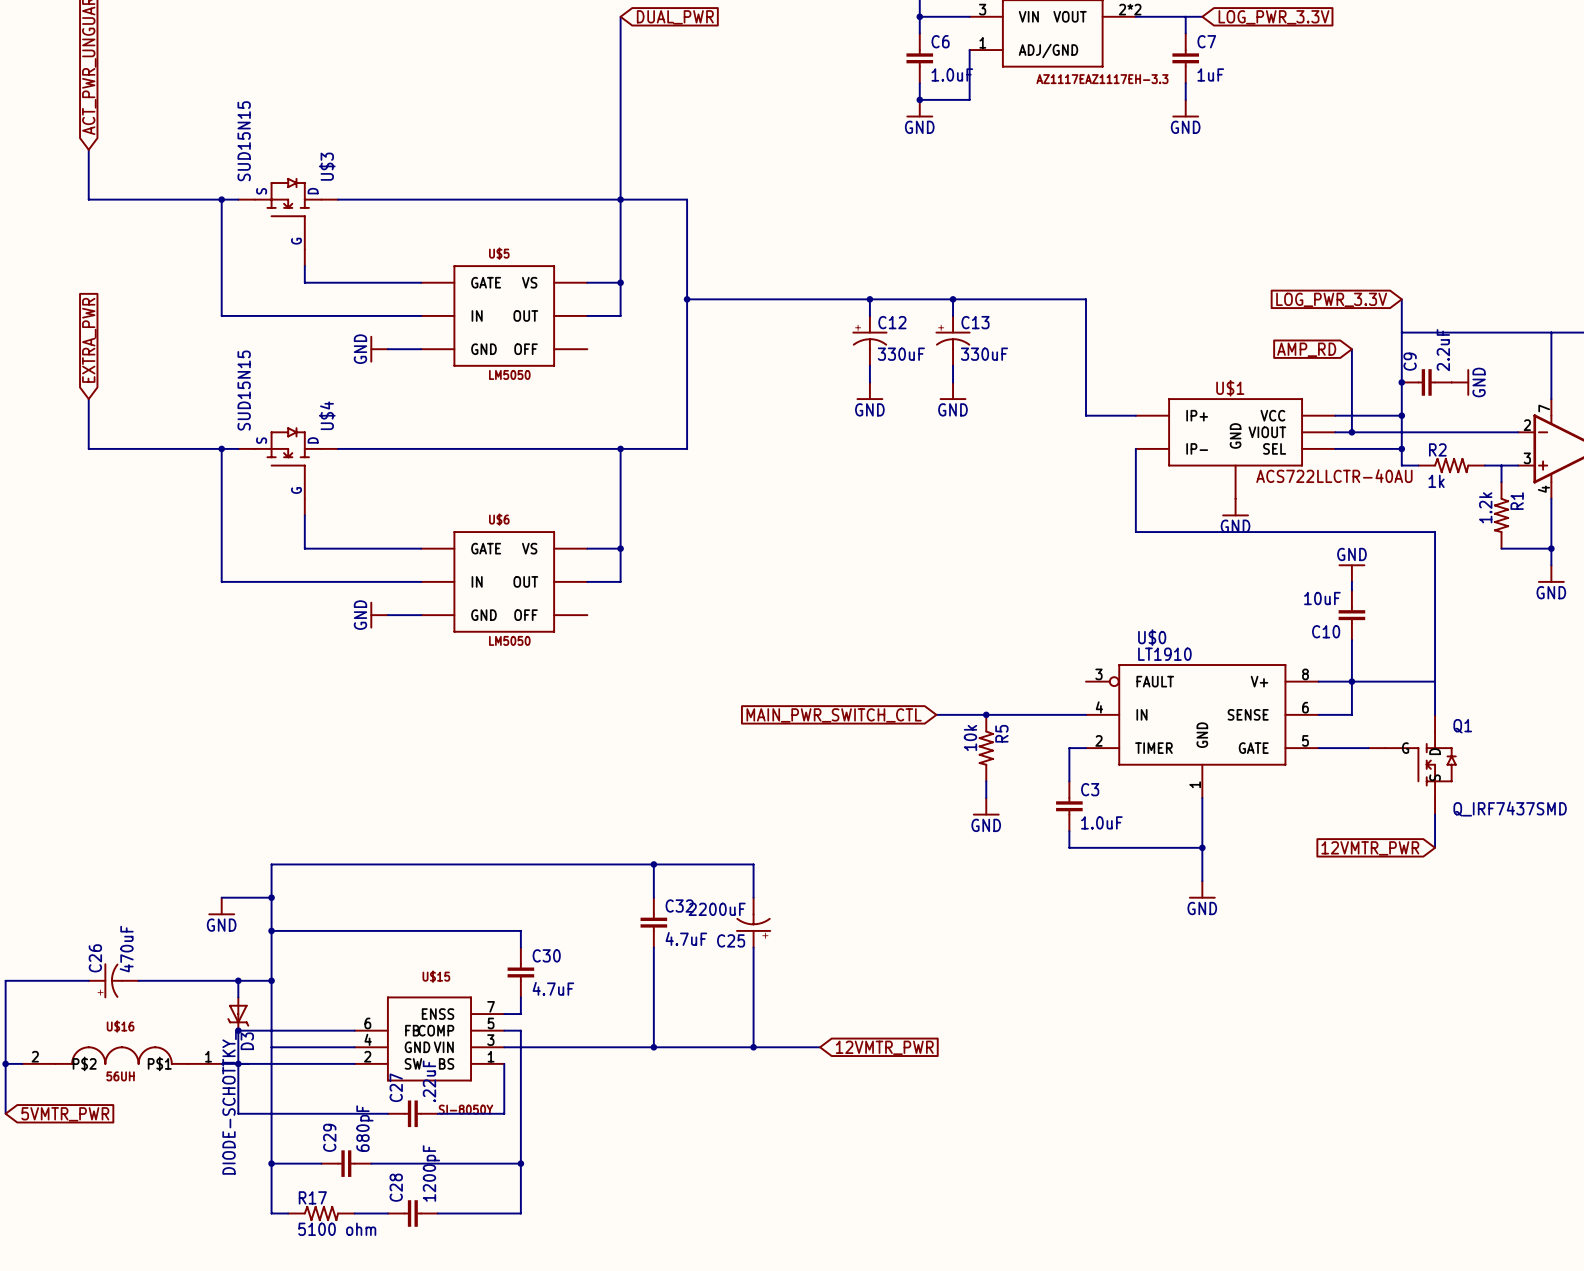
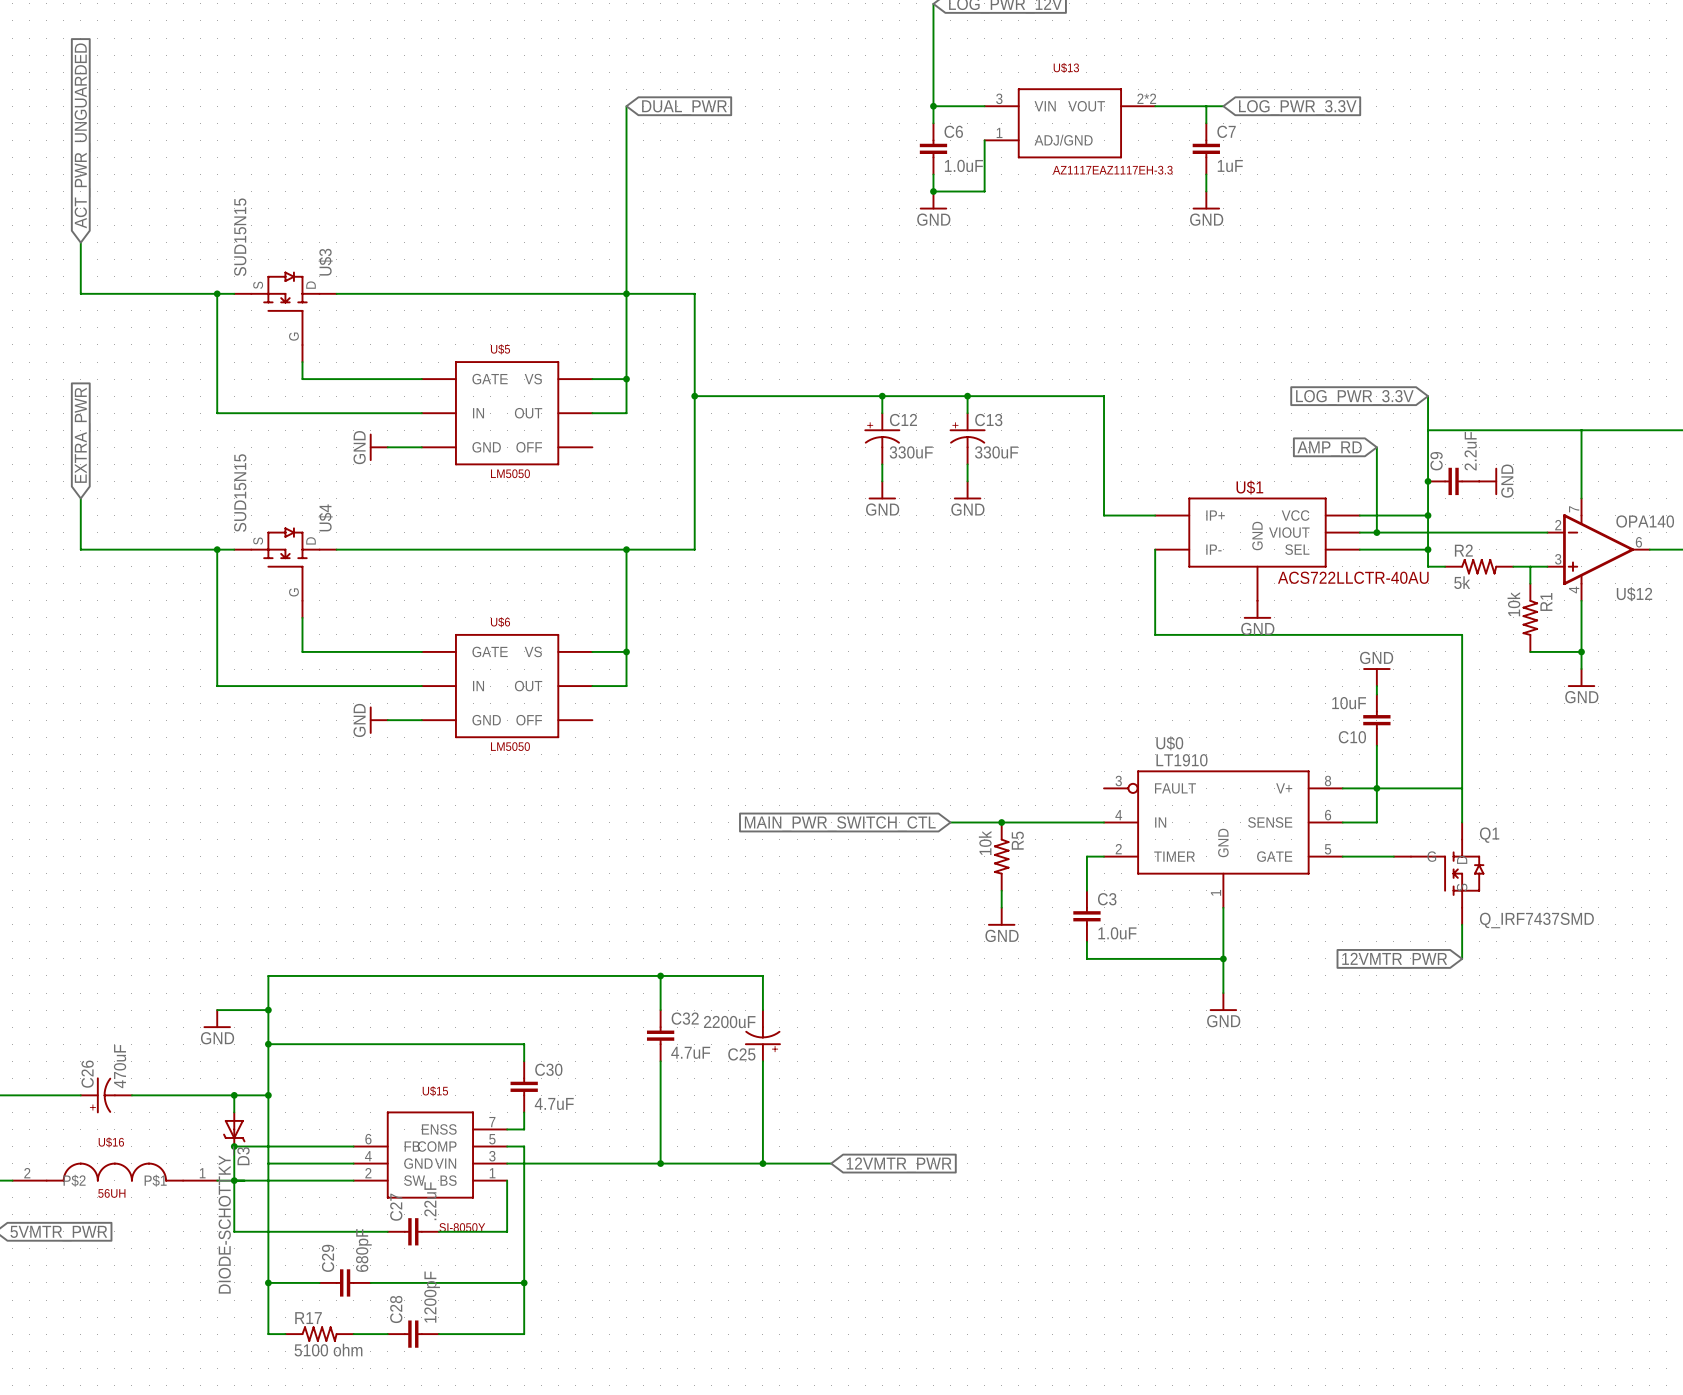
R2 value: 1k (1436, 481) -> 5k (1462, 582)
R1 value: 1.2k (1485, 507) -> 10k (1513, 604)

